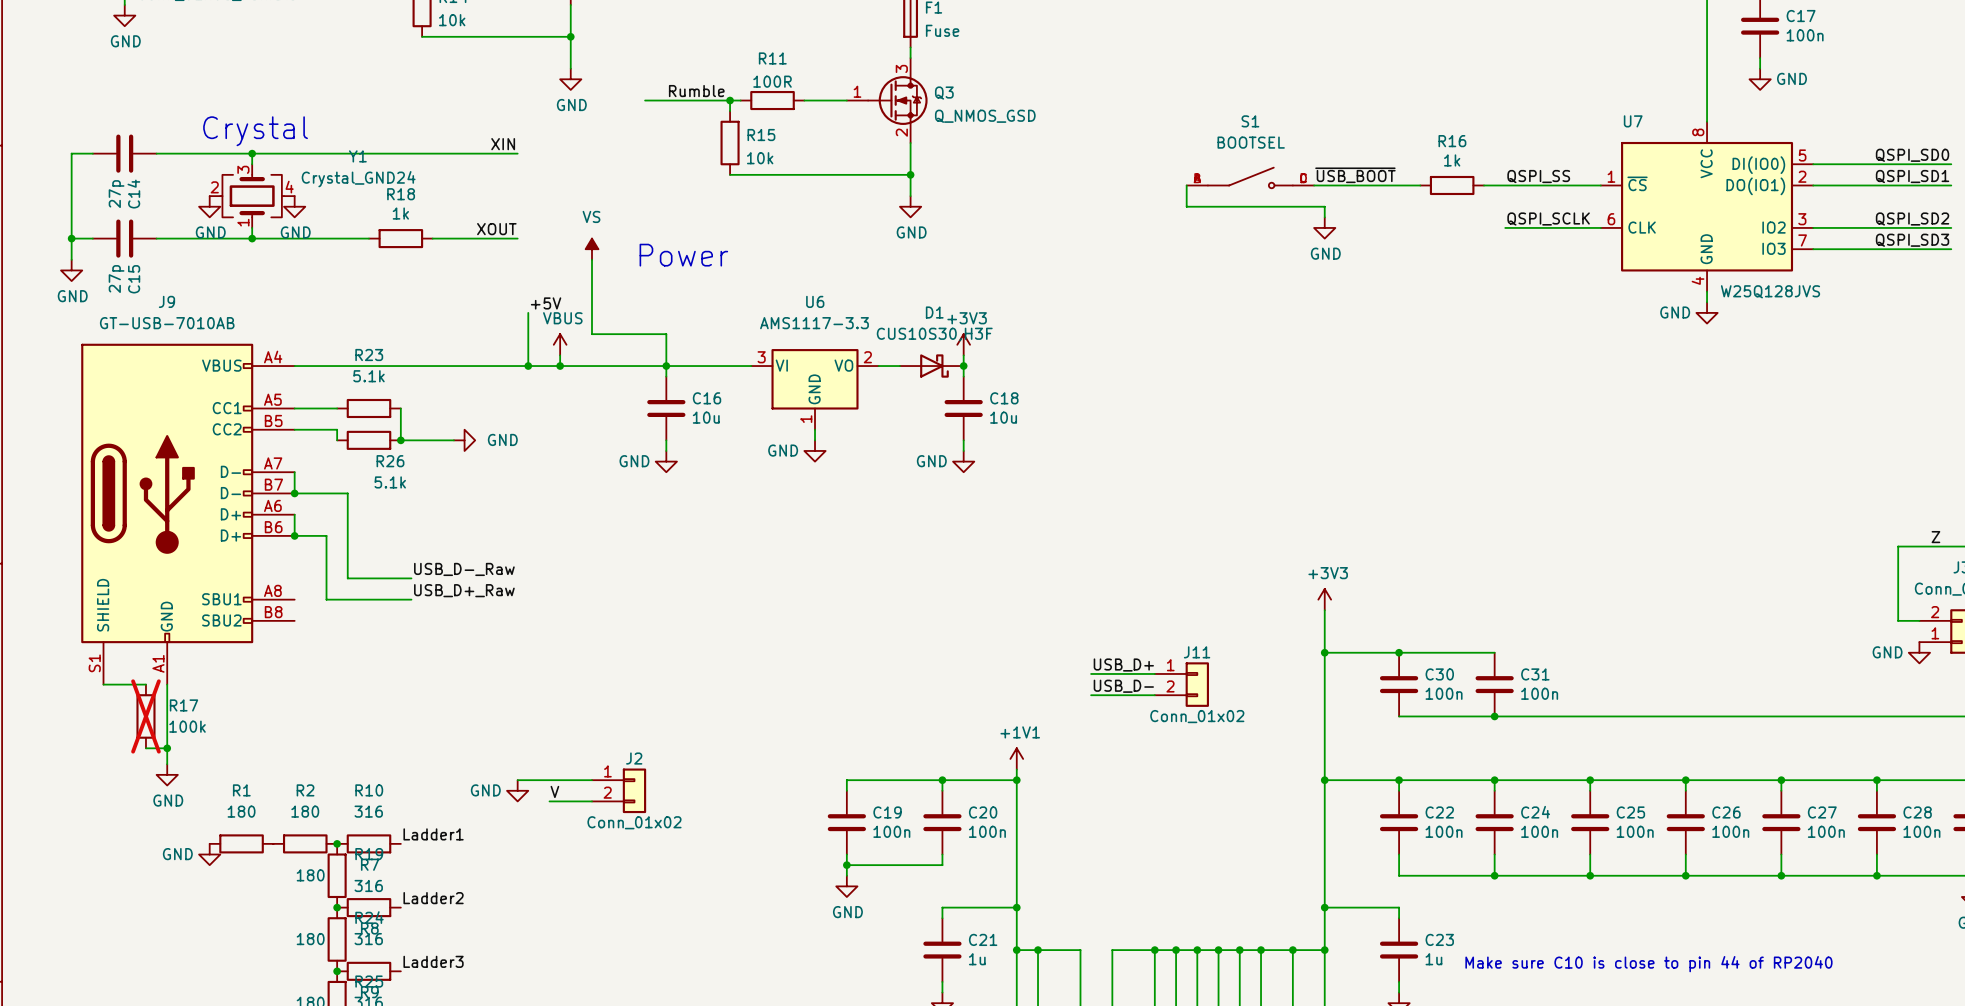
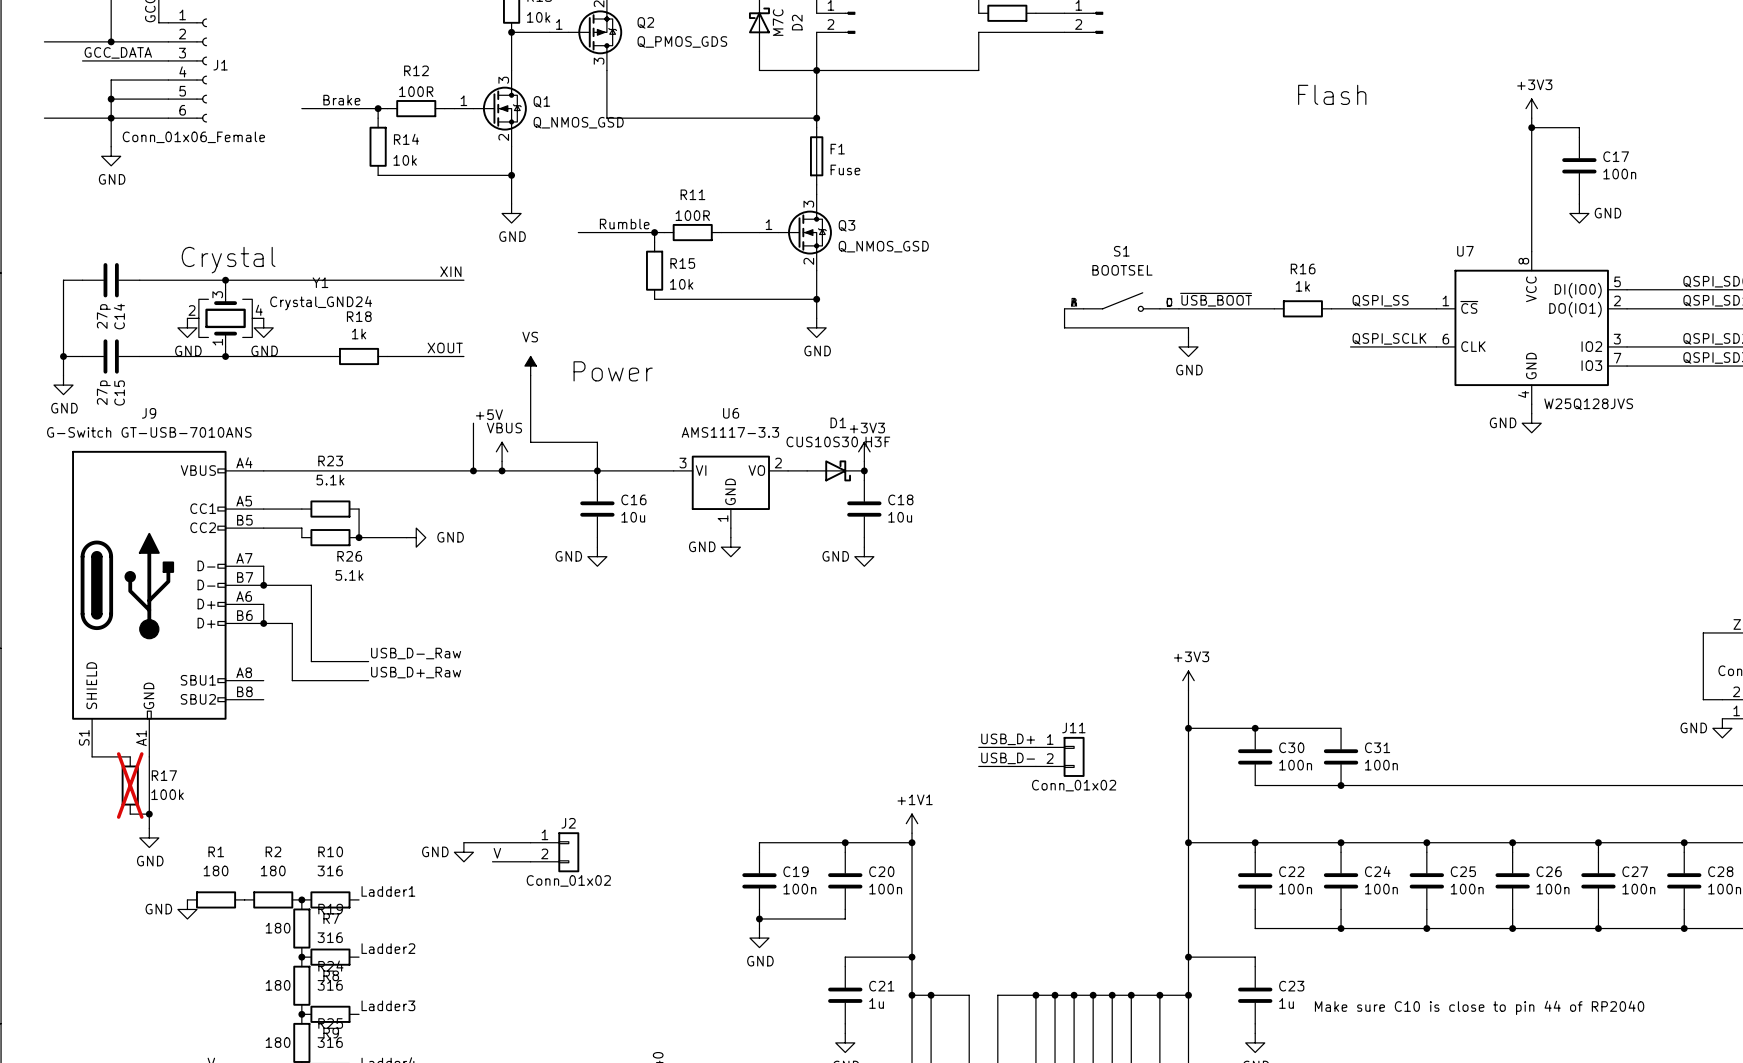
J9 value: GT-USB-7010AB (167, 323) -> G-Switch GT-USB-7010ANS (149, 432)

